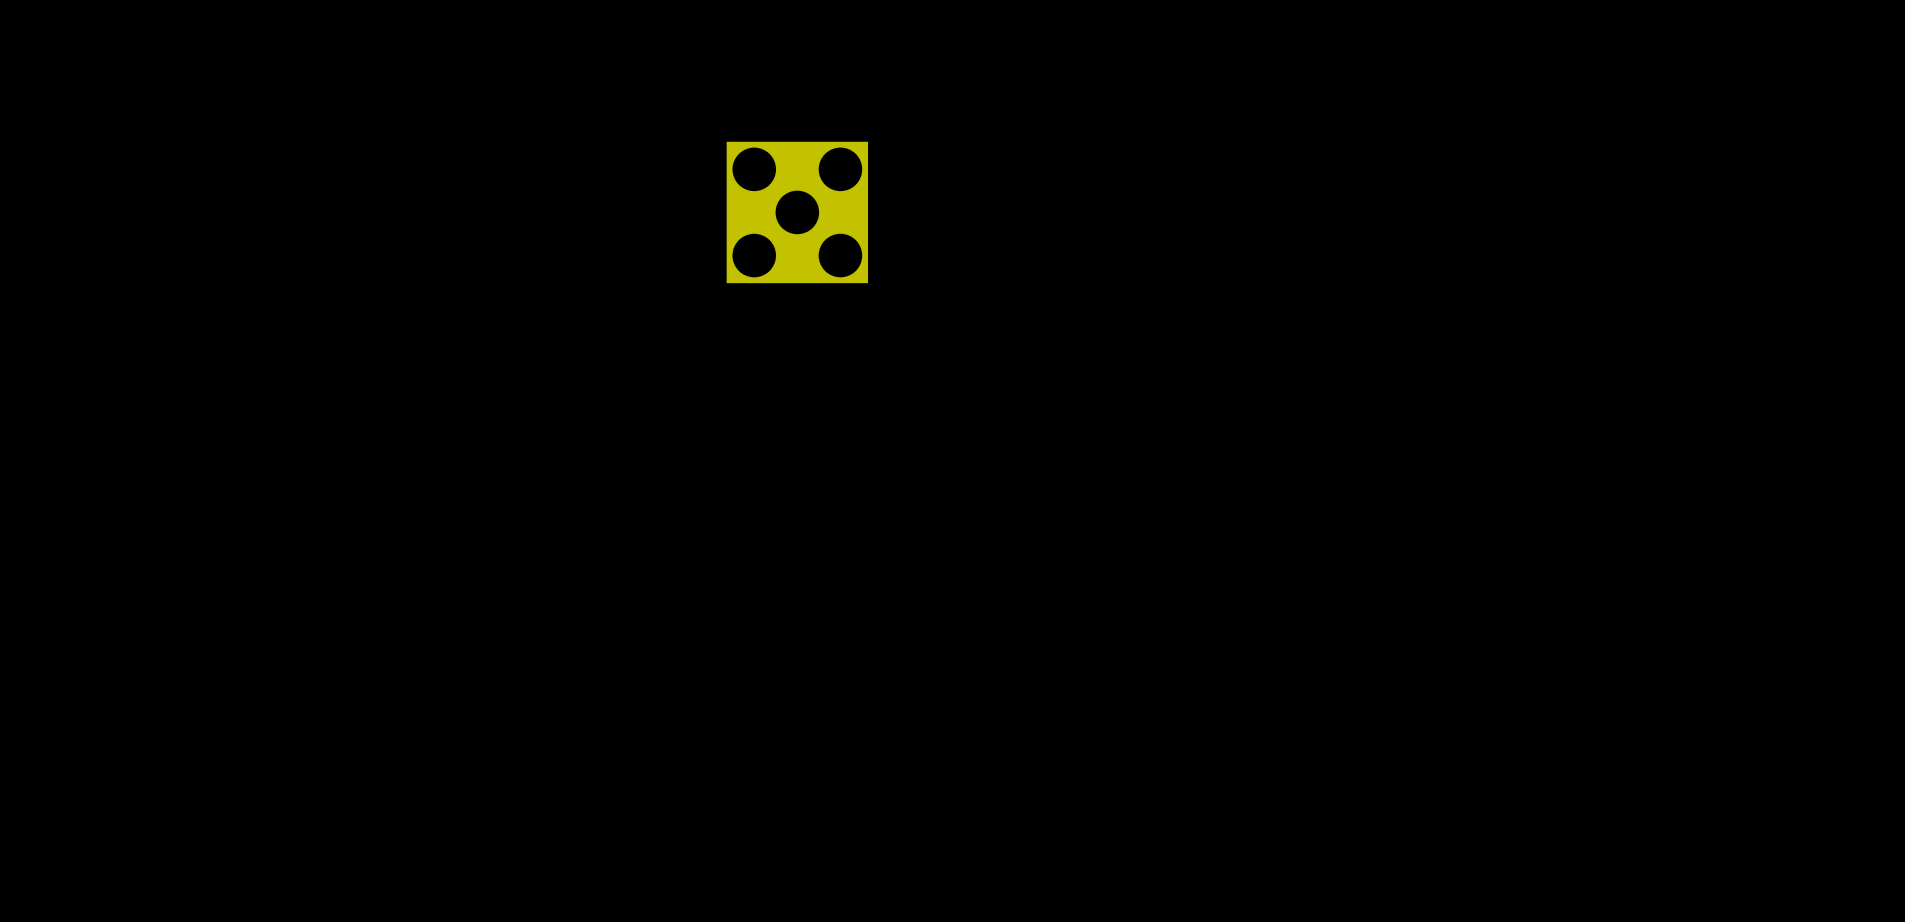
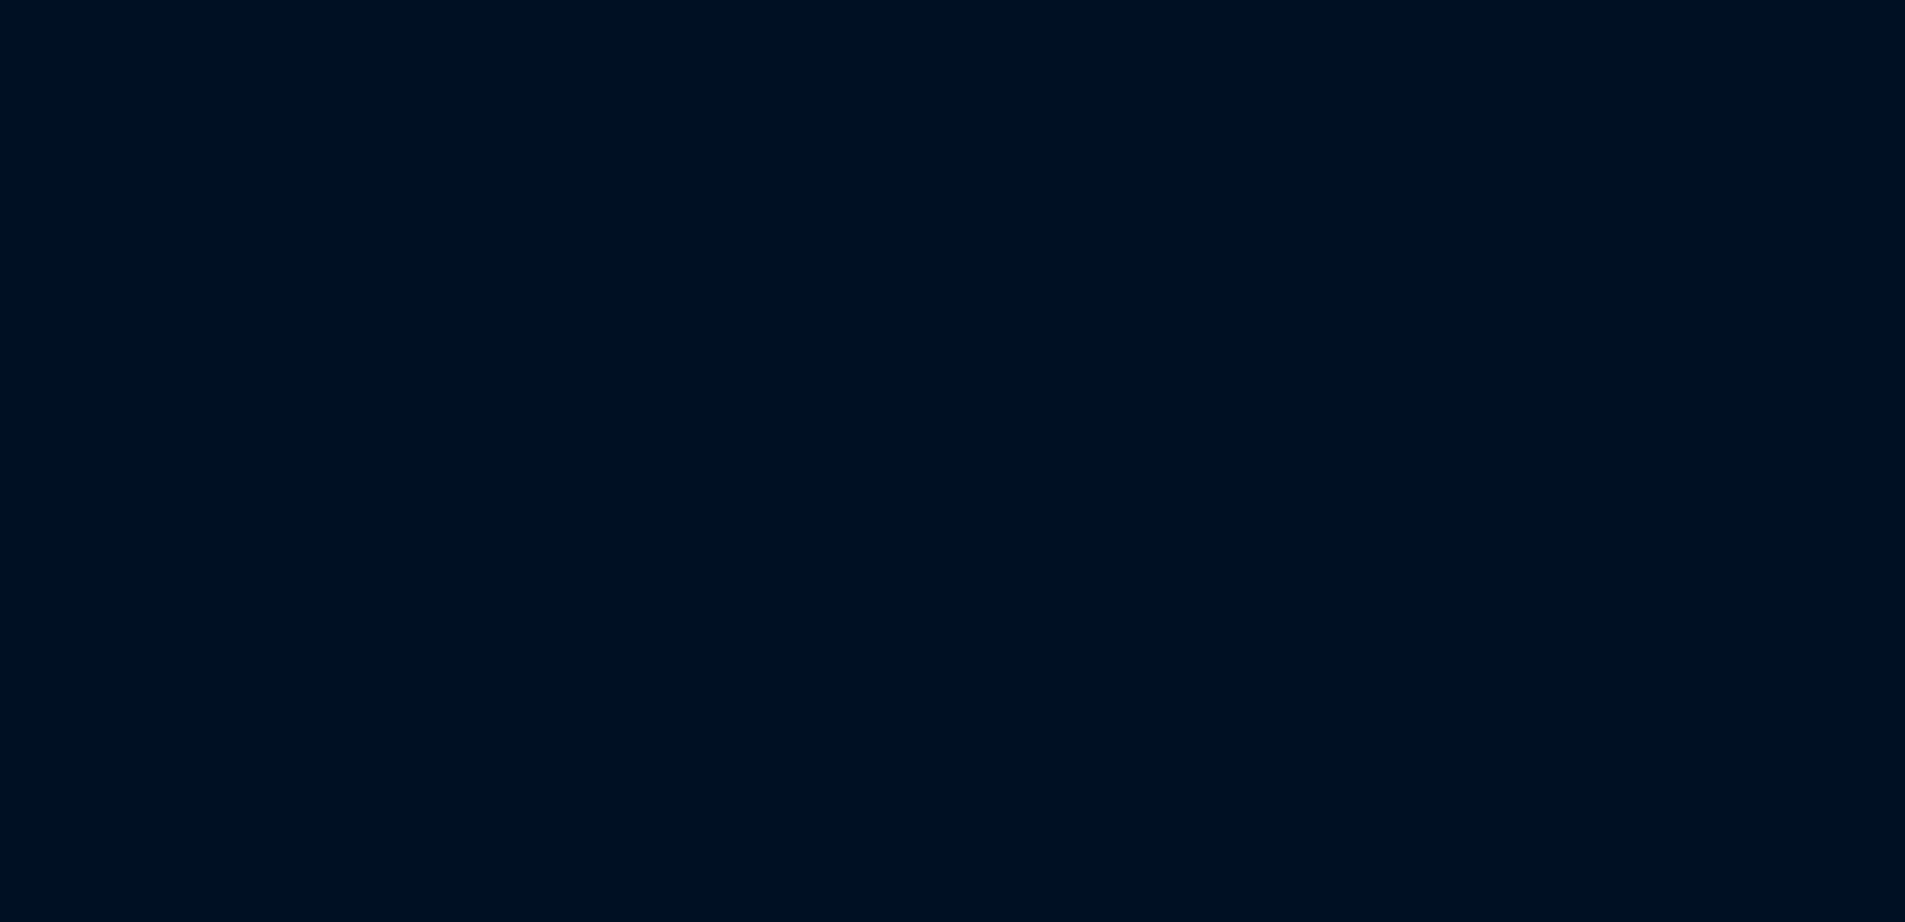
part: (797, 212) -> none

